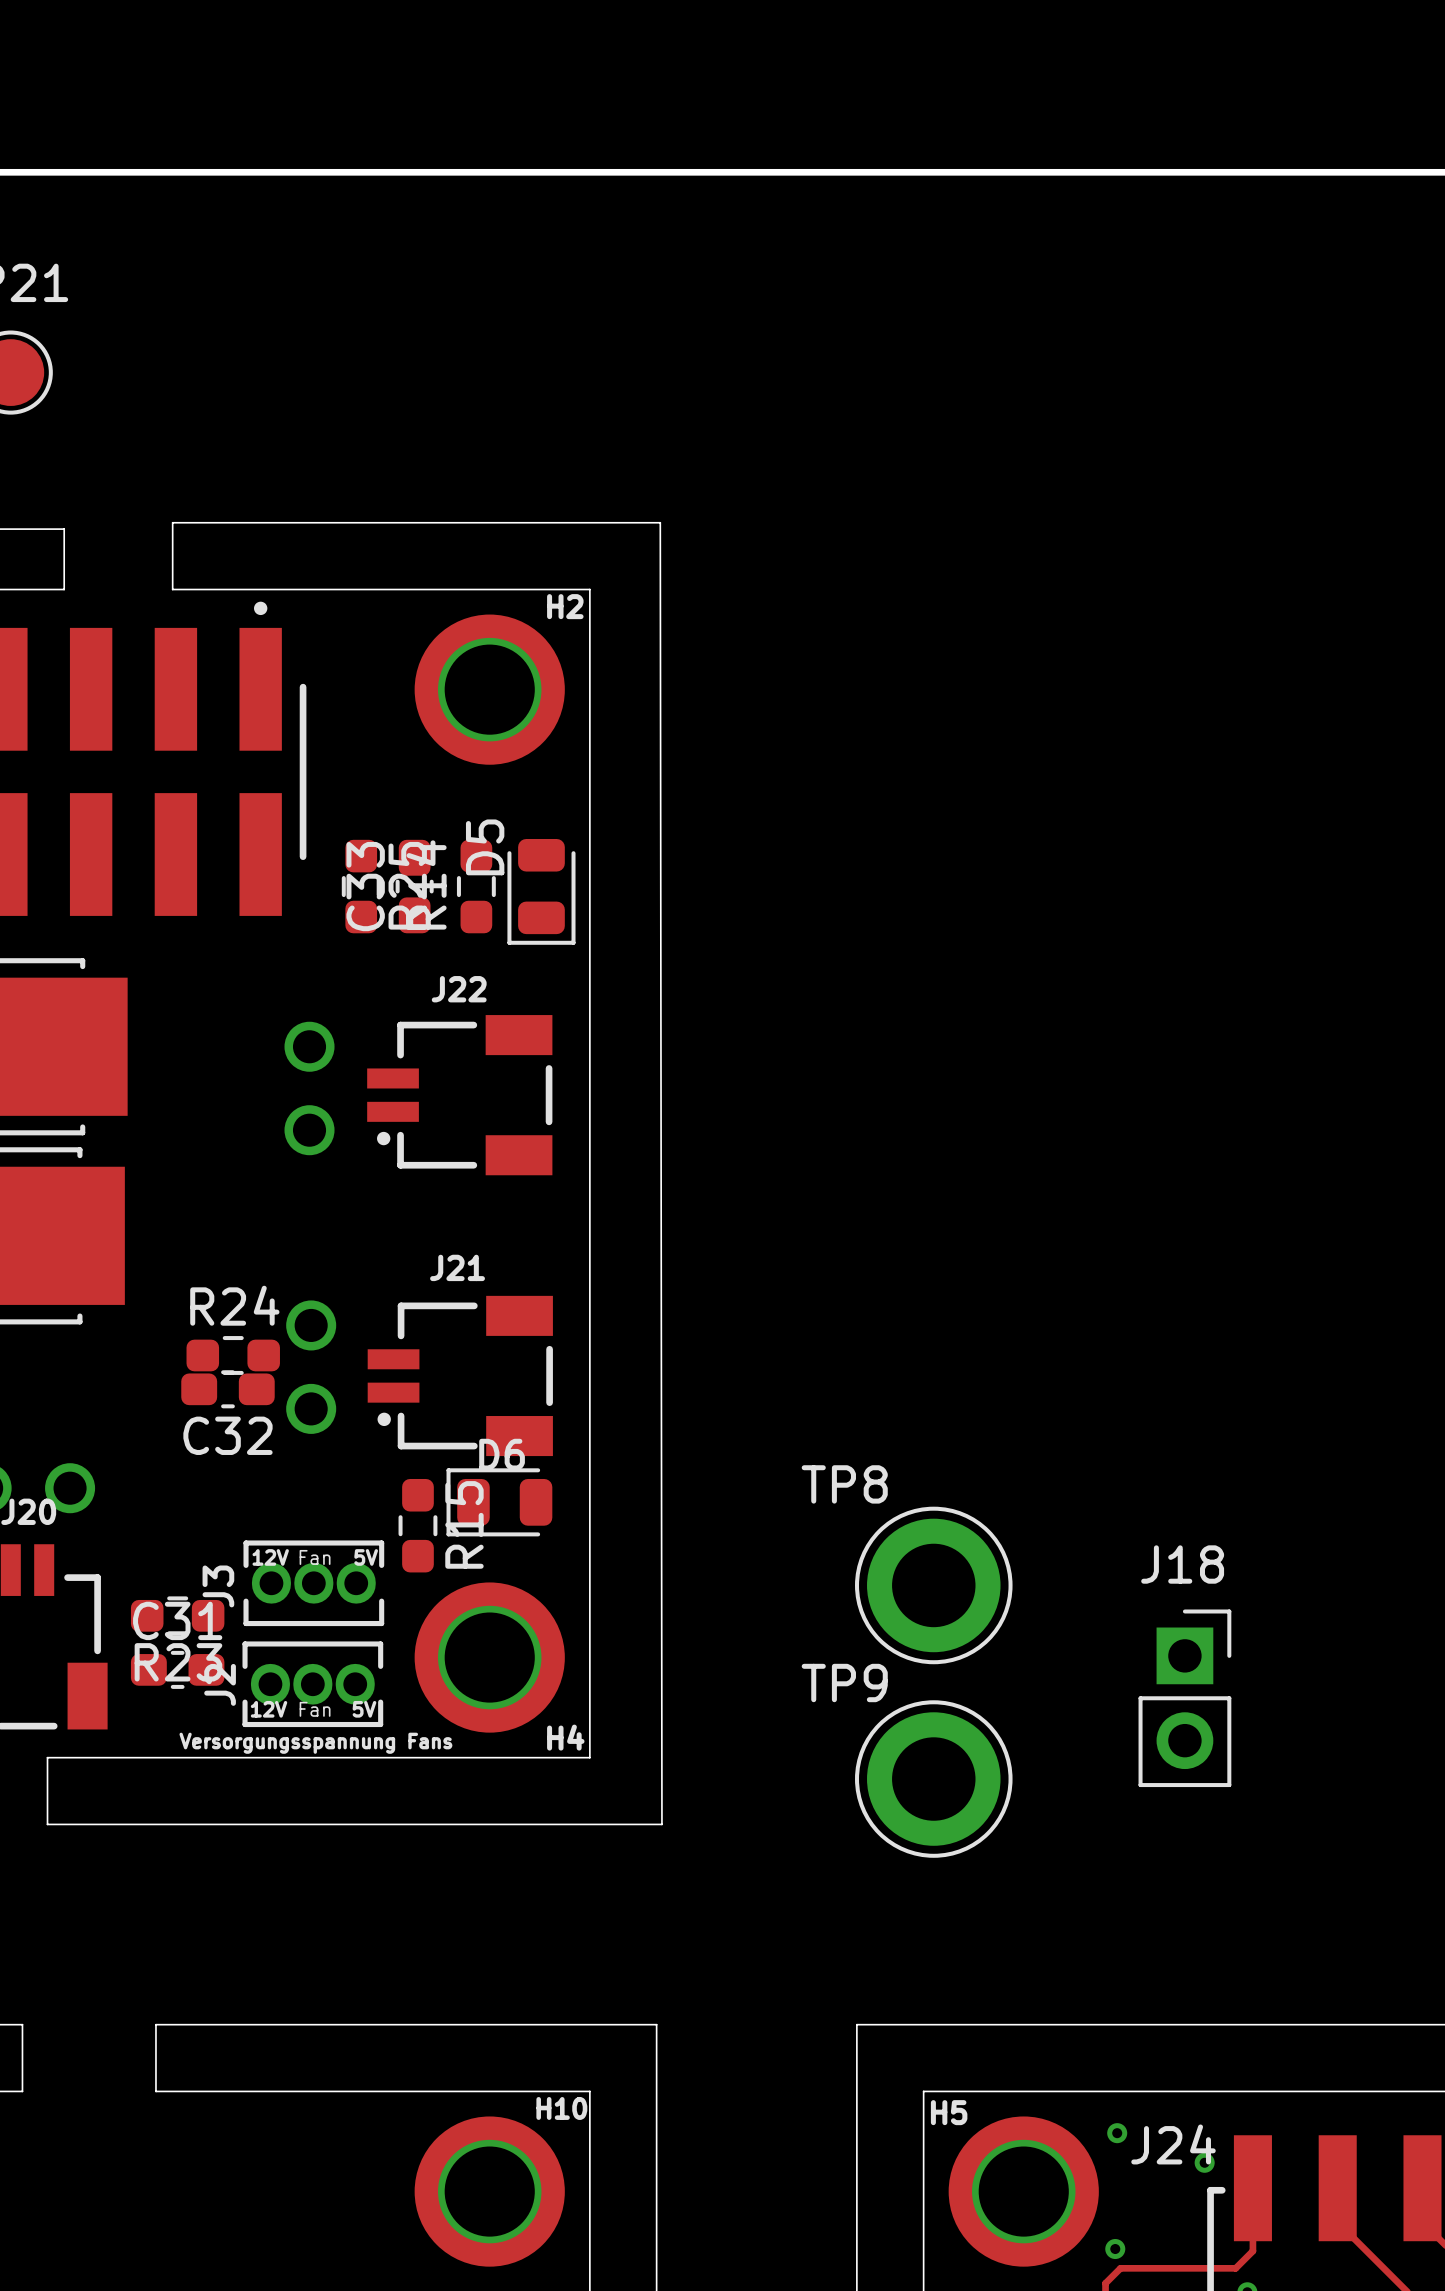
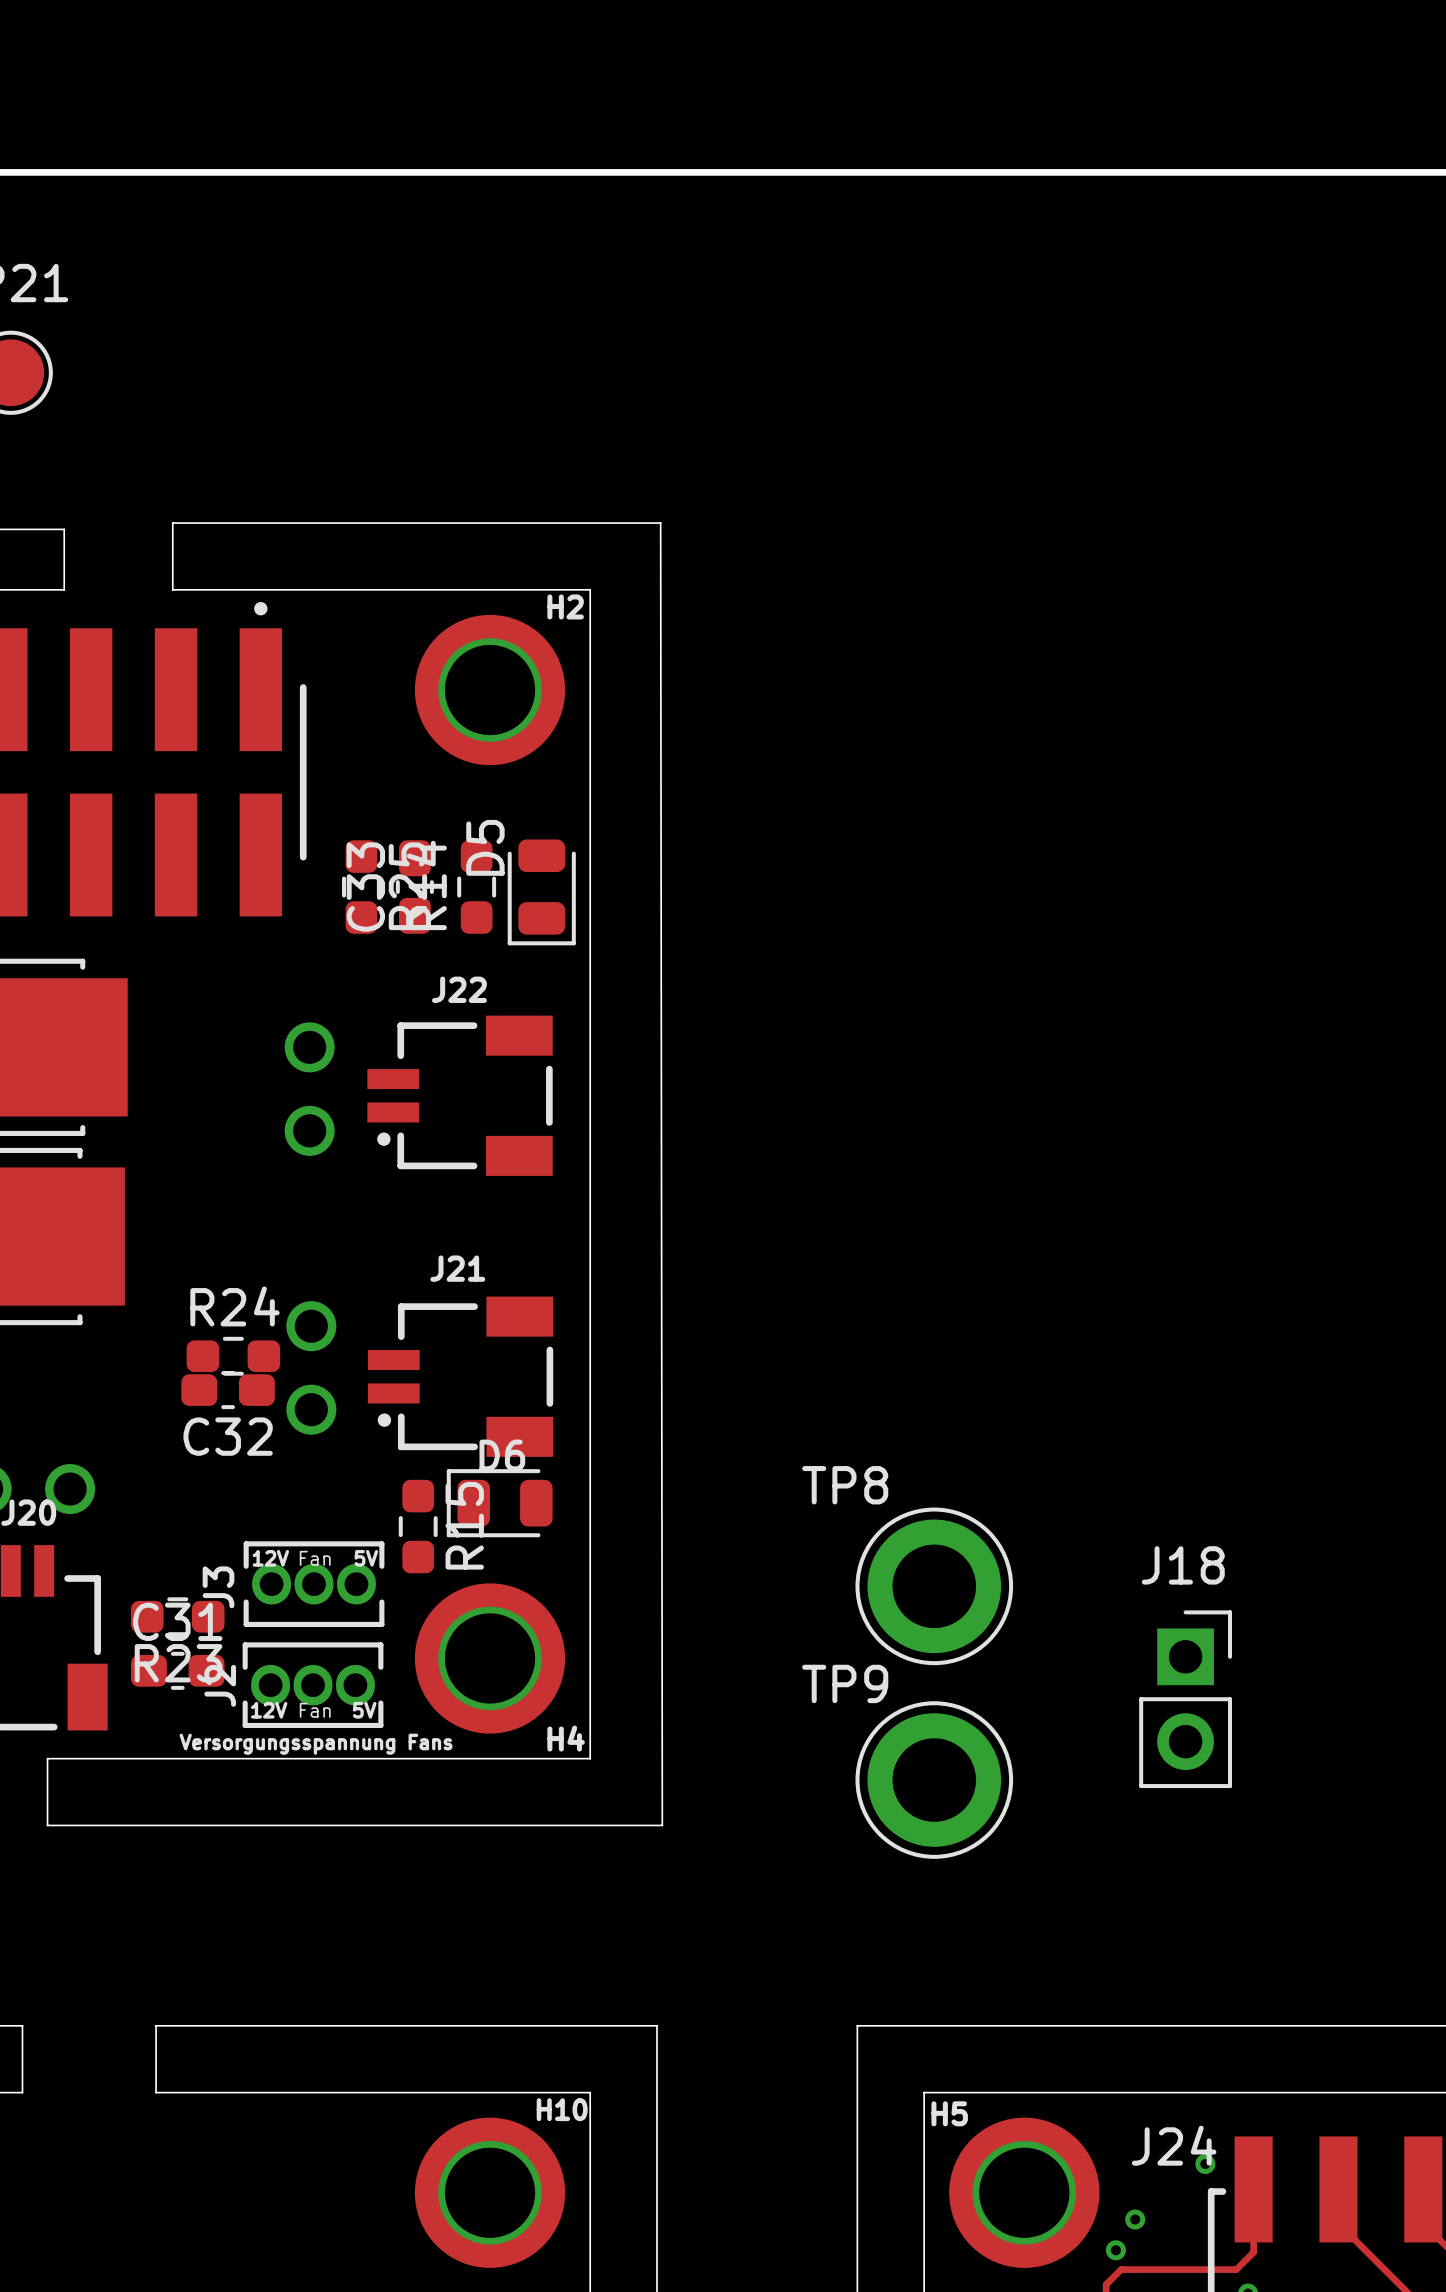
via position: (1117, 2133) -> (1135, 2219)

